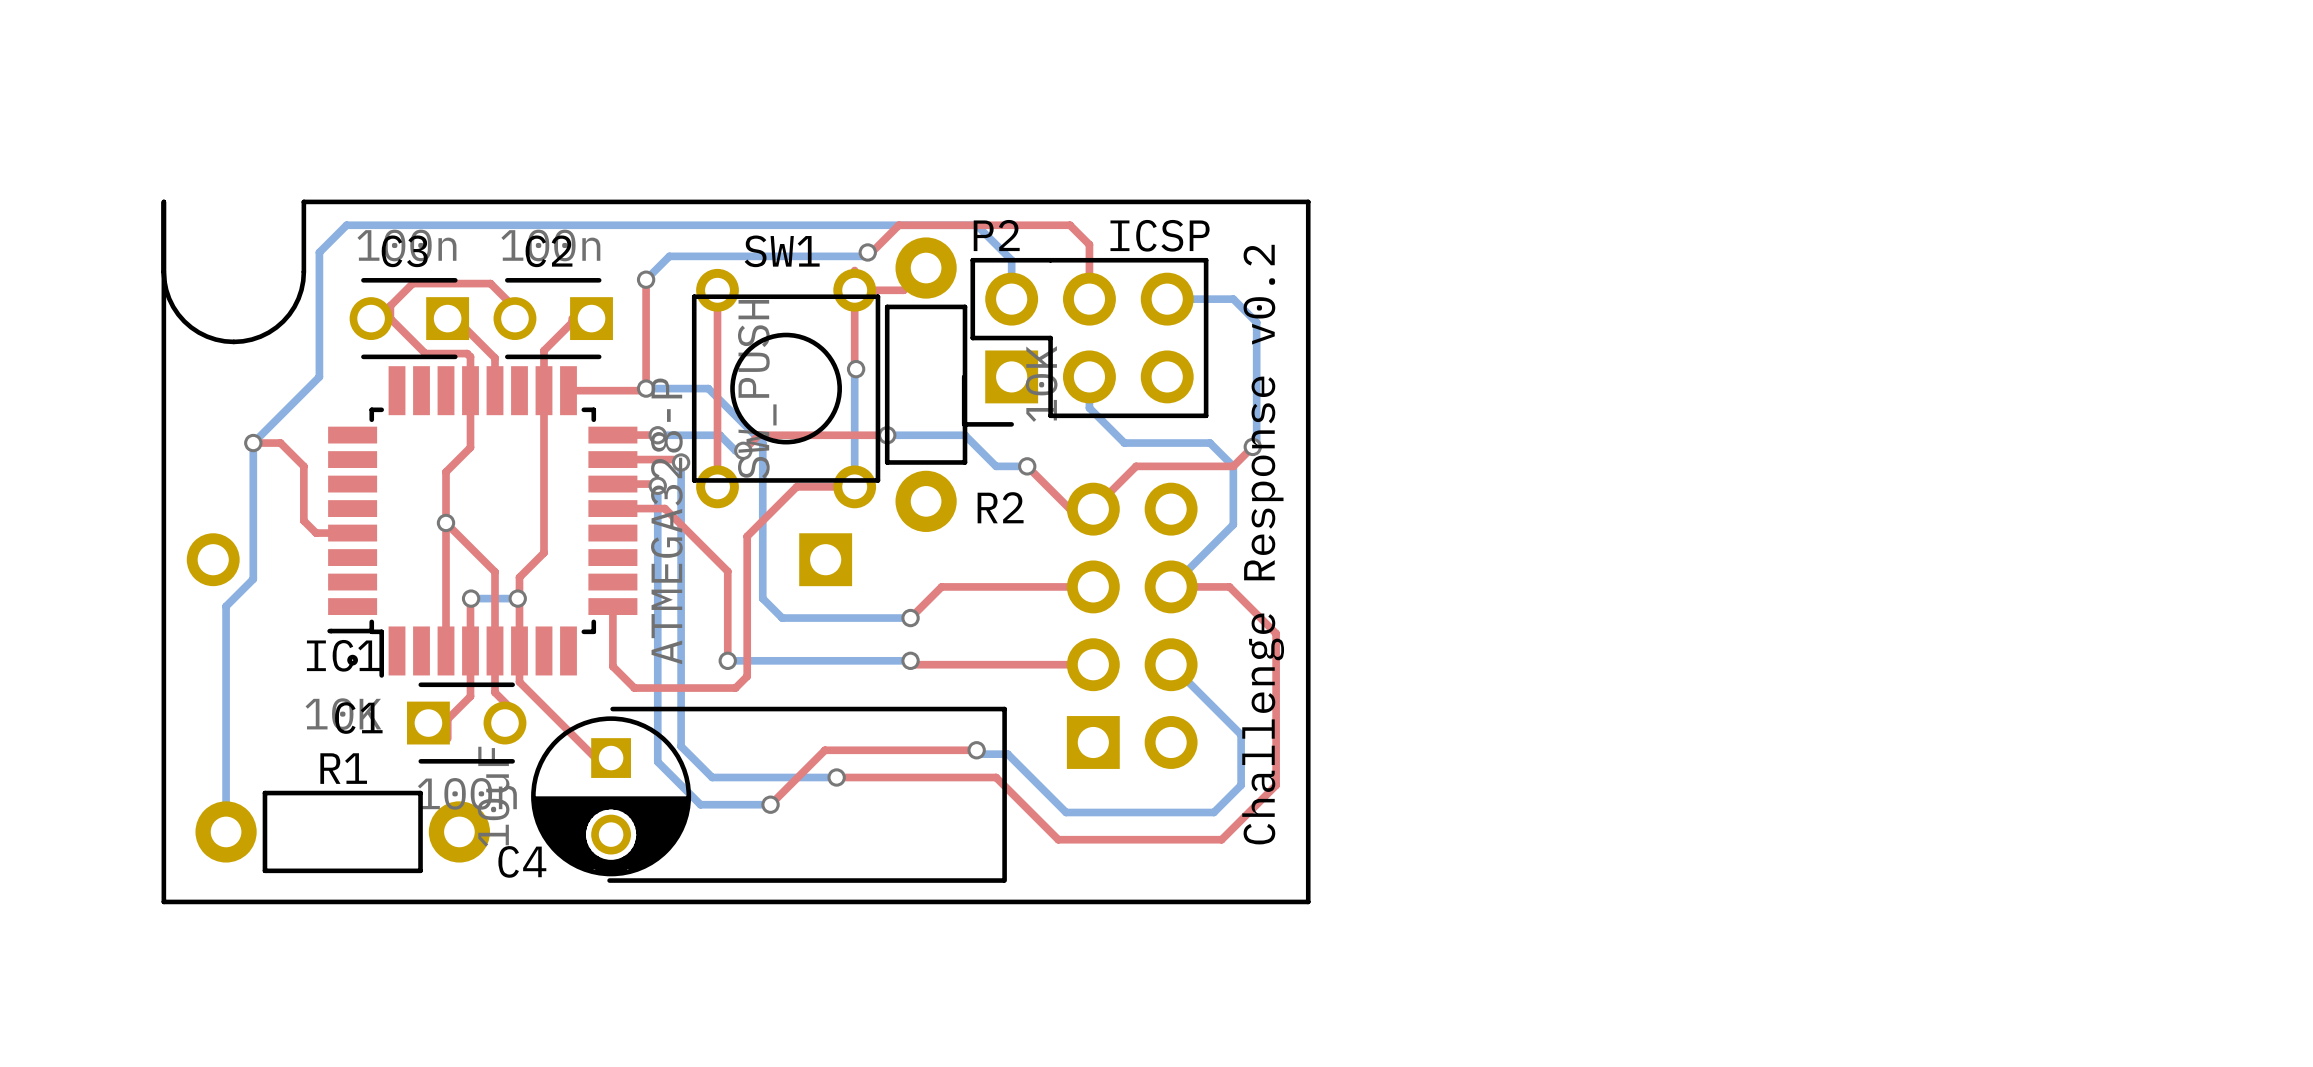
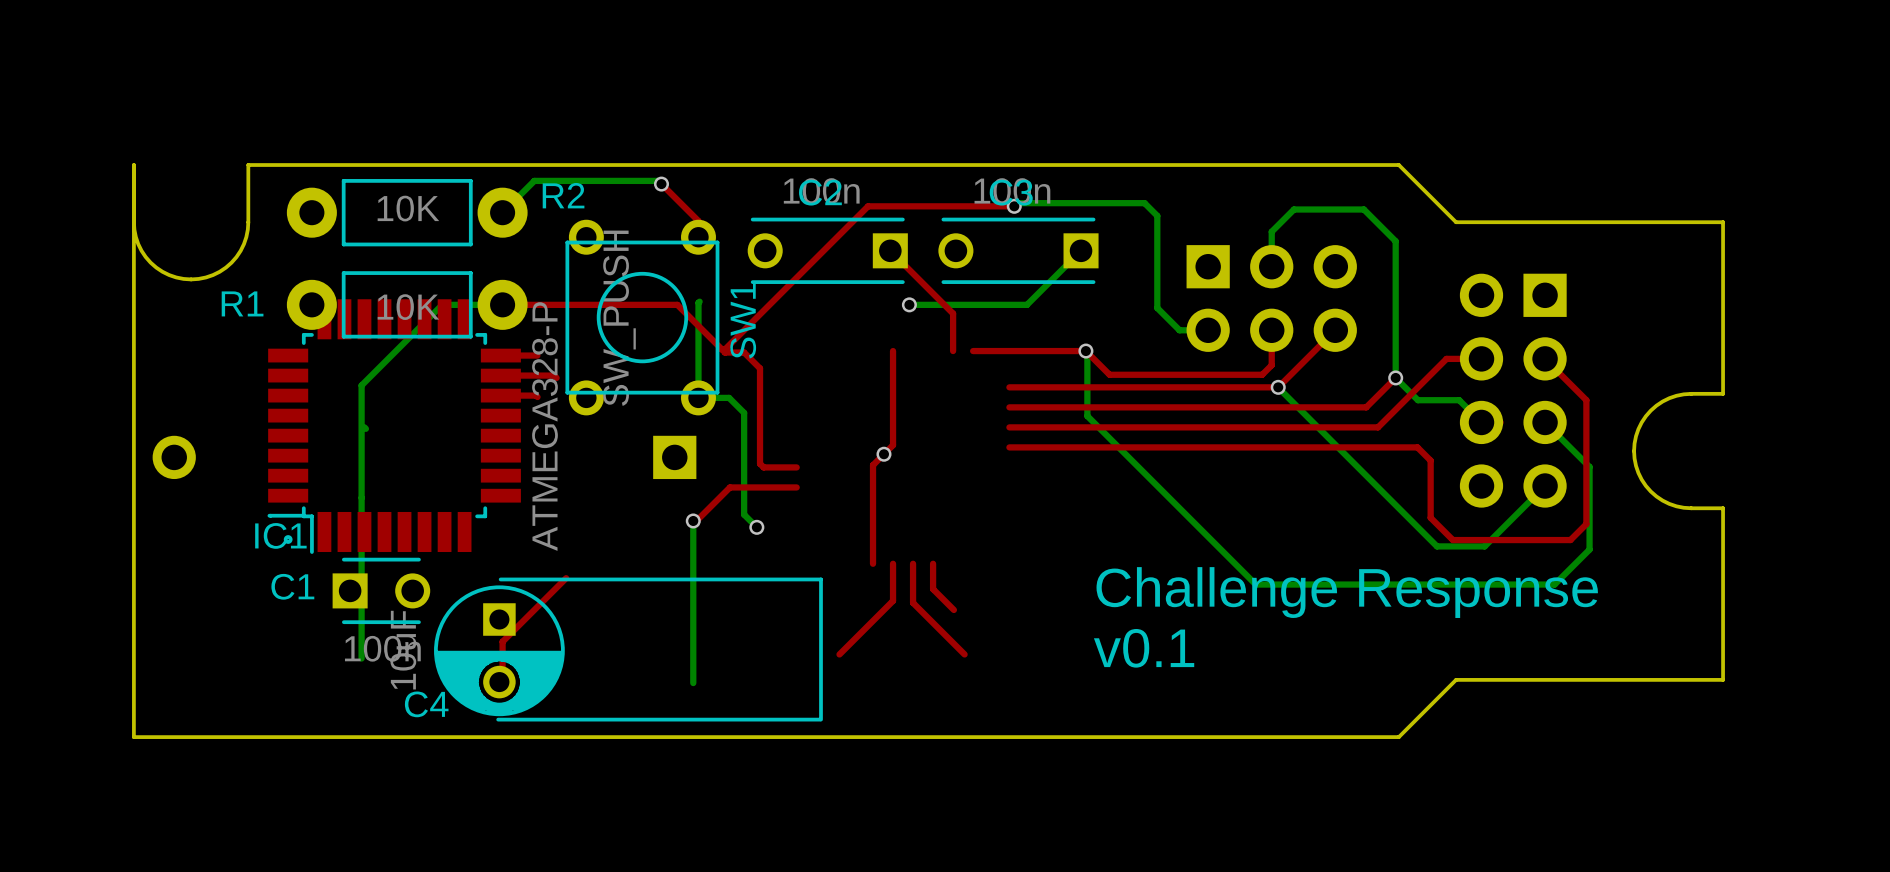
board edge: (1308, 201) (1308, 901) -> (1069, 165) (1398, 165) (1456, 222) (1723, 222) (1723, 393) (1683, 394) (1662, 401) (1650, 410) (1641, 422) (1636, 436) (1634, 451) (1636, 465) (1641, 479) (1650, 491) (1662, 500) (1683, 507) (1723, 508) (1723, 679) (1456, 679) (1398, 737) (1069, 737)
top track: none -> (661, 184) (698, 221)
bottom track: none -> (661, 184) (658, 180) (534, 180) (502, 212)
SW1 name rotation: 0° (782, 251) -> 90° counterclockwise (743, 320)
SW1 name position: SW1 (782, 251) -> SW1 (743, 320)
top track: (867, 252) (871, 252) (898, 225) (1070, 225) (1089, 244) (1089, 299) -> none
bottom track: (867, 252) (863, 256) (669, 256) (646, 279) -> none
via position: (867, 252) -> (661, 184)
top track: none -> (1014, 206) (868, 206) (725, 349)
bottom track: none -> (1014, 206) (1017, 203) (1144, 203) (1157, 215) (1157, 308) (1179, 330) (1208, 330)
via: none -> (1014, 206)
top track: (926, 268) (903, 290) (854, 290) (856, 369) -> none
C3 footprint: [349, 278, 470, 360] -> [938, 217, 1099, 284]
C2 footprint: [493, 278, 613, 360] -> [747, 217, 908, 284]
top track: (646, 279) (646, 388) (644, 390) (568, 390) -> none
via: (646, 279) -> none
top track: (717, 290) (717, 486) -> none
bottom track: (1011, 299) (1011, 260) (976, 225) (346, 225) (319, 252) (319, 376) (253, 443) (253, 579) (226, 606) (226, 831) -> none
bottom track: (1167, 299) (1233, 299) (1256, 322) (1256, 443) (1252, 446) -> none
top track: none -> (890, 250) (953, 313) (953, 351)
bottom track: none -> (1081, 250) (1027, 304) (909, 304)
top track: (451, 318) (455, 318) (495, 358) (495, 390) -> none
top track: (510, 318) (510, 304) (490, 283) (412, 283) (390, 305) (390, 318) (425, 353) (467, 353) (470, 356) (470, 447) (446, 472) (446, 650) -> none
top track: (572, 318) (572, 322) (544, 350) (544, 552) (519, 577) (519, 682) (595, 758) (611, 758) -> none
bottom track: none -> (1271, 266) (1271, 231) (1293, 209) (1363, 209) (1395, 241) (1395, 377) (1417, 400) (1459, 400) (1481, 422)
P2 side: top (1085, 342) -> bottom (1271, 298)
via: (856, 369) -> none
top track: none -> (502, 304) (677, 304) (725, 352)
bottom track: none -> (502, 304) (442, 304) (361, 385) (361, 658)
via: none -> (909, 304)
bottom track: (1089, 376) (1089, 408) (1124, 443) (1210, 443) (1233, 466) (1233, 524) (1171, 586) -> none
R2 rotation: 0° (926, 384) -> 90° clockwise (407, 212)
R2 position: (926, 384) -> (407, 212)
bottom track: (646, 388) (708, 388) (762, 443) (762, 598) (782, 618) (910, 618) -> none
via: (646, 388) -> none
top track: none -> (1271, 330) (1271, 365) (1262, 374) (1109, 374) (1085, 351) (973, 351)
top track: none -> (1335, 330) (1278, 387) (1009, 387)
top track: none -> (893, 351) (893, 445) (873, 465) (873, 563)
bottom track: none -> (1085, 351) (1087, 416) (1255, 584) (1554, 584) (1589, 549) (1589, 466) (1545, 422)
top track: none -> (725, 352) (744, 352) (760, 368) (760, 463) (763, 467) (796, 467)
bottom track: (657, 435) (719, 435) (735, 450) (743, 450) -> none
via: (657, 435) -> none
top track: (887, 435) (758, 435) (743, 450) -> none
bottom track: (887, 435) (964, 435) (996, 466) (1027, 466) -> none
via: (887, 435) -> none
top track: none -> (1481, 358) (1446, 358) (1378, 427) (1009, 427)
top track: none -> (1545, 358) (1586, 400) (1586, 524) (1570, 540) (1452, 540) (1430, 517) (1430, 460) (1417, 447) (1009, 447)
top track: (253, 443) (280, 443) (303, 466) (303, 520) (316, 533) (352, 533) -> none
via: (253, 443) -> none
top track: (1252, 446) (1233, 466) (1136, 466) (1093, 509) (1070, 509) (1027, 466) -> none
via position: (1252, 446) -> (1085, 351)
via: (743, 450) -> none
bottom track: (681, 462) (681, 746) (712, 777) (836, 777) -> none
via: (681, 462) -> none
top track: none -> (1395, 377) (1366, 407) (1009, 407)
via: none -> (1395, 377)
via: (1027, 466) -> none
via: none -> (1278, 387)
bottom track: none -> (1278, 387) (1437, 546) (1484, 546) (1545, 486)
bottom track: (657, 485) (657, 761) (700, 804) (770, 804) -> none
via: (657, 485) -> none
top track: (854, 486) (796, 486) (747, 536) (747, 676) (735, 688) (634, 688) (612, 666) (612, 606) -> none
bottom track: none -> (698, 397) (729, 397) (744, 412) (744, 514) (756, 527)
R2 name position: R2 (1000, 507) -> R2 (563, 195)
top track: (612, 508) (664, 508) (727, 571) (727, 660) -> none
top track: (446, 522) (495, 571) (495, 692) (508, 706) (508, 738) -> none
via: (446, 522) -> none
text: Challenge Response v0.2 (1263, 544) -> none
via: none -> (883, 454)
top track: (1093, 586) (941, 586) (910, 618) -> none
top track: (1171, 586) (1229, 586) (1276, 633) (1276, 785) (1221, 839) (1058, 839) (996, 777) (836, 777) -> none
top track: none -> (796, 487) (730, 487) (696, 520) (693, 520)
top track: (471, 598) (470, 696) (447, 719) (447, 738) -> none
bottom track: (471, 598) (517, 598) -> none
via: (471, 598) -> none
via: (517, 598) -> none
via: (910, 618) -> none
part rotation: 0° (1132, 625) -> 180° (1513, 390)
part position: (1132, 625) -> (1513, 390)
bottom track: none -> (693, 520) (693, 683)
via: none -> (693, 520)
bottom track: (727, 660) (910, 660) -> none
via: (727, 660) -> none
top track: (910, 660) (914, 664) (1093, 664) -> none
via position: (910, 660) -> (756, 527)
bottom track: (1171, 664) (1241, 734) (1241, 785) (1213, 812) (1066, 812) (1007, 754) (980, 754) (976, 750) -> none
top track: none -> (893, 563) (893, 600) (839, 654)
top track: none -> (913, 563) (913, 602) (964, 654)
top track: none -> (933, 563) (933, 589) (953, 609)
top track: none -> (566, 578) (502, 641) (502, 683)
text: none -> Challenge Response (1347, 592)
top track: (976, 750) (824, 750) (770, 804) -> none
via: (976, 750) -> none
R1 name position: R1 (343, 768) -> R1 (242, 303)
via: (836, 777) -> none
text: none -> v0.1 (1144, 648)
via: (770, 804) -> none
R1 position: (342, 831) -> (407, 304)

